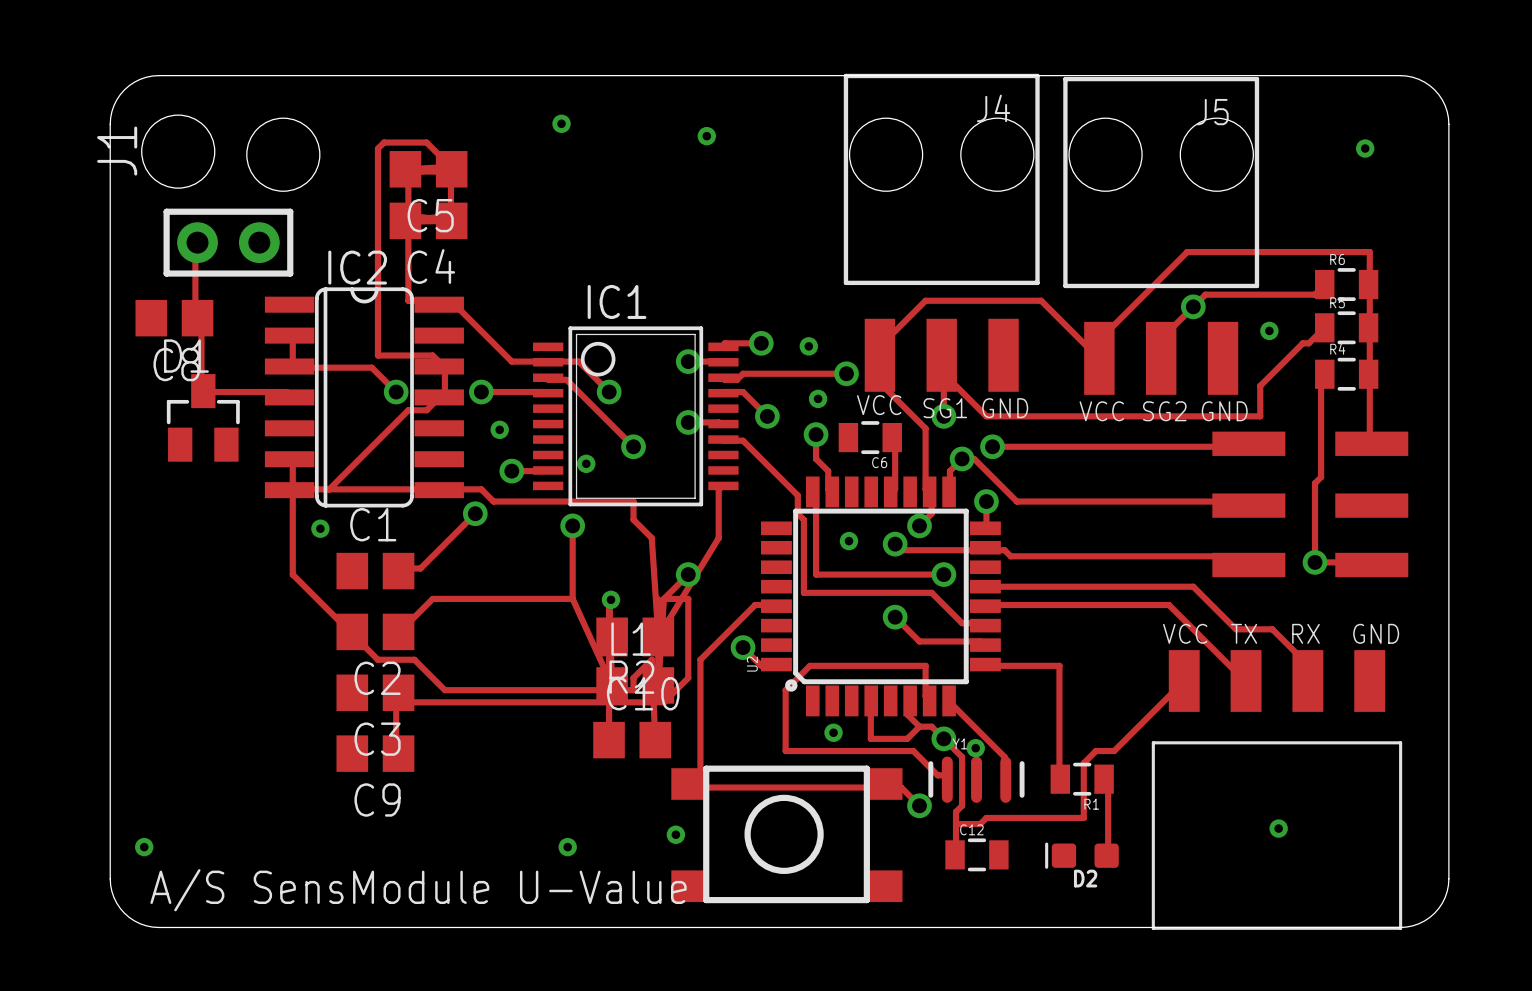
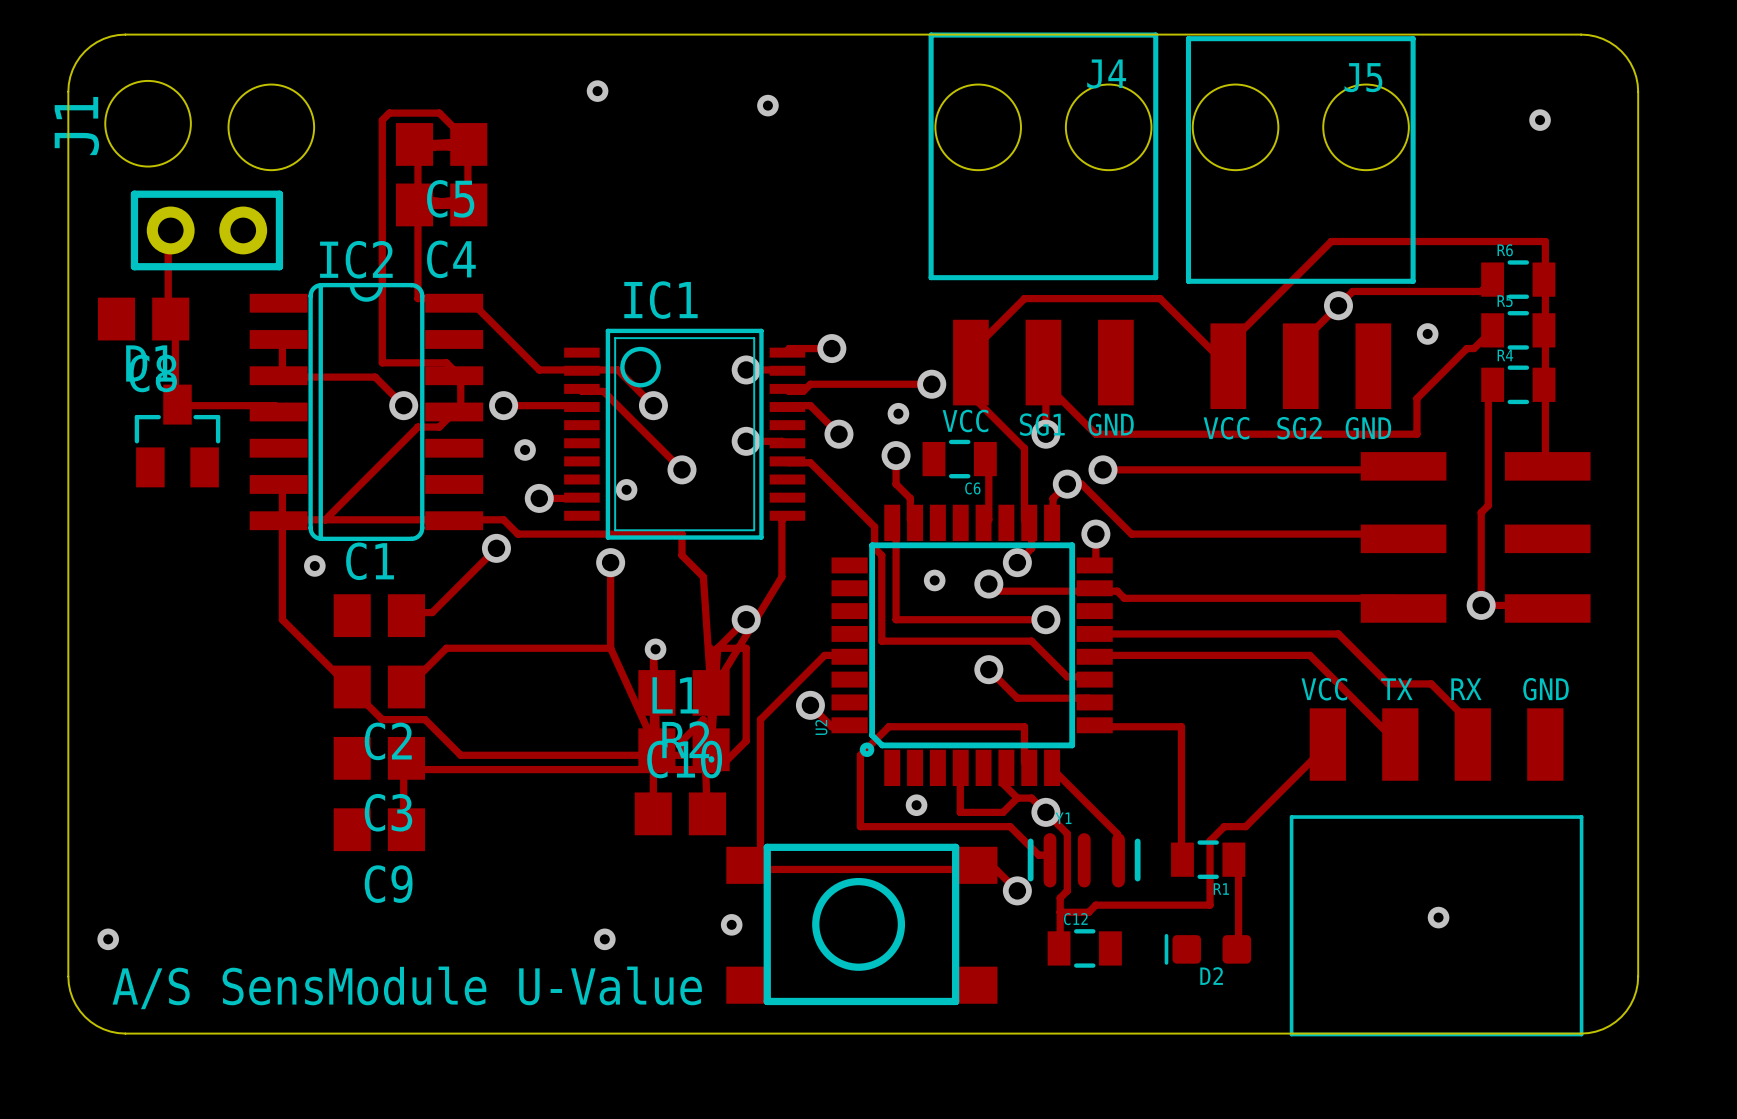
via: (808, 346) -> none
via: (975, 748) -> none

